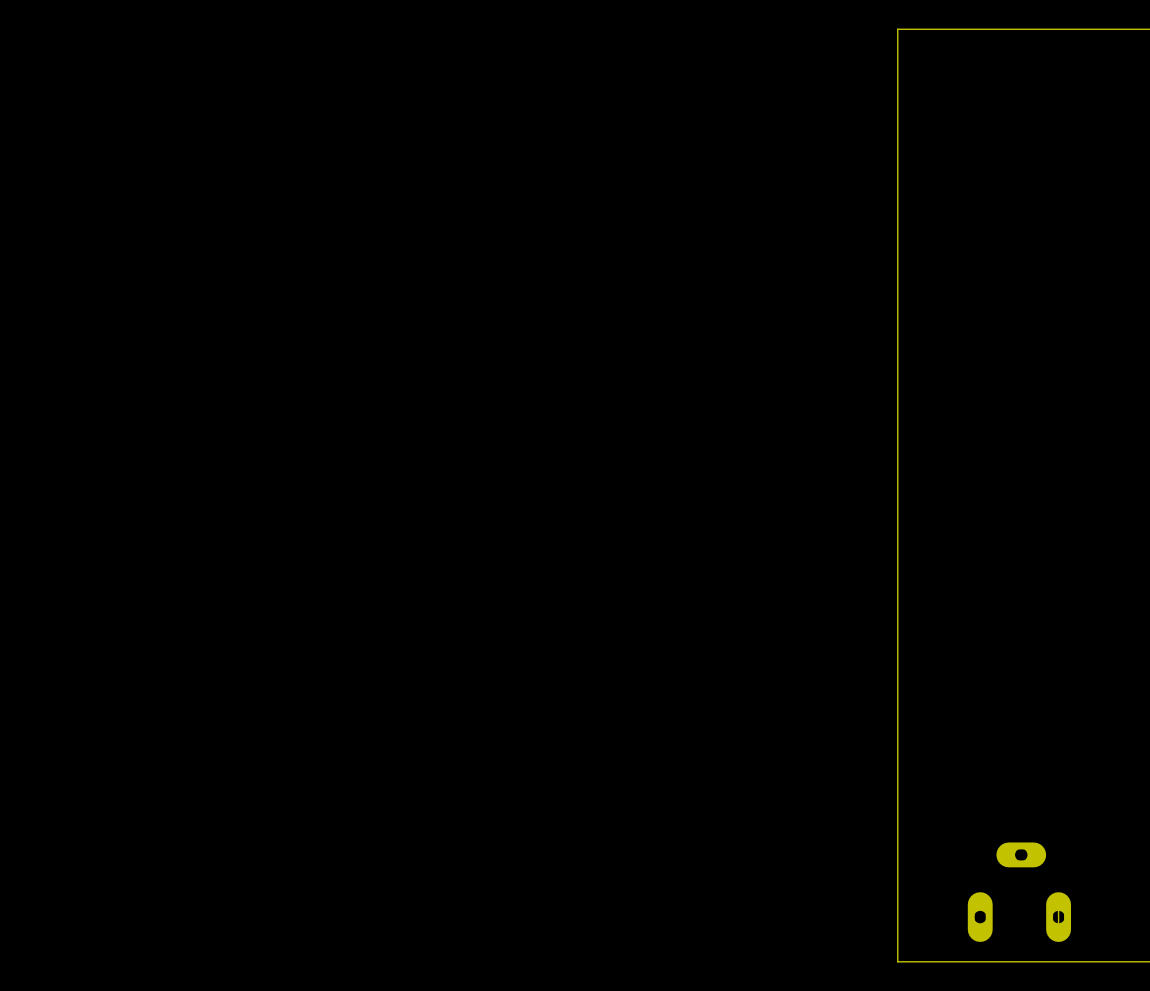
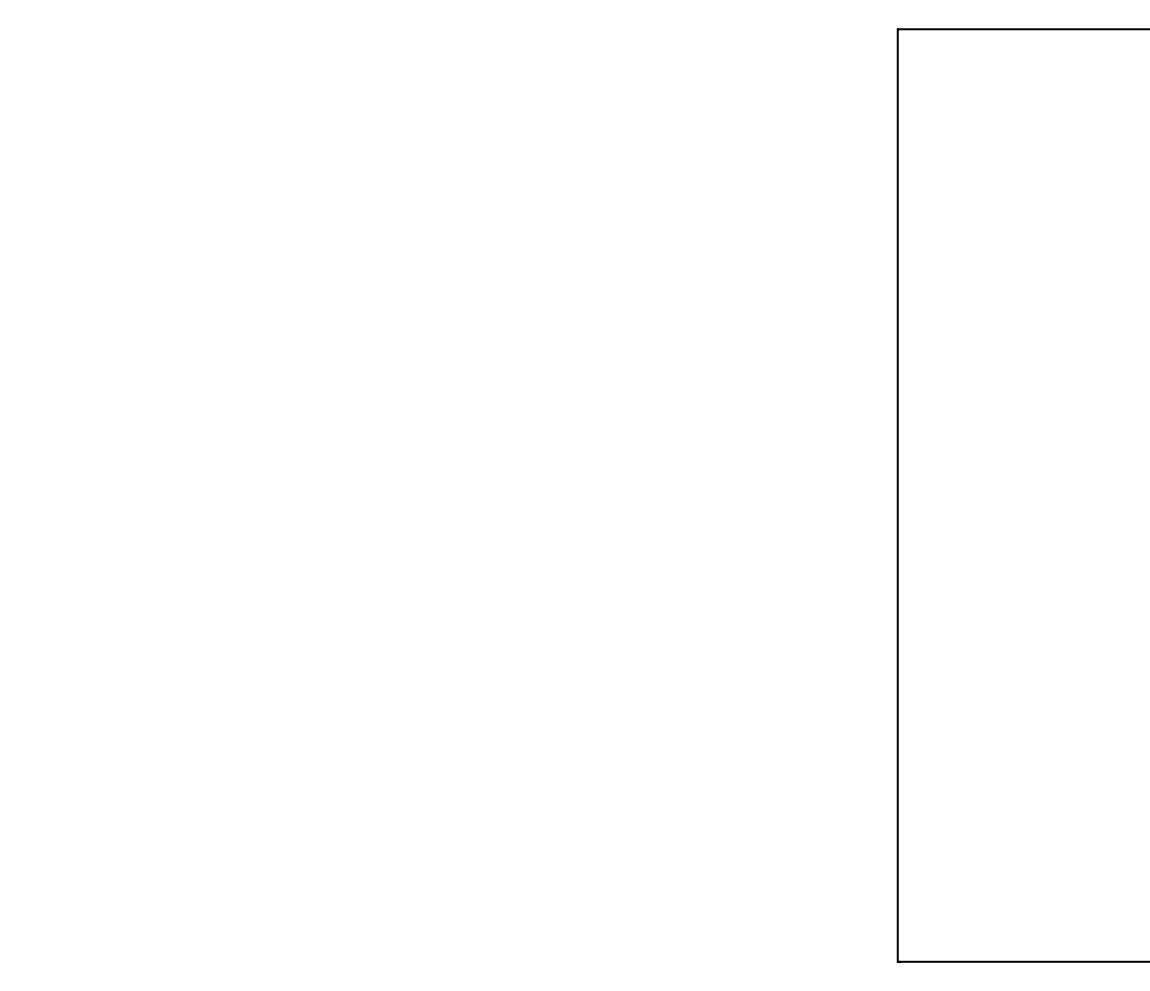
part: (1019, 892) -> none

